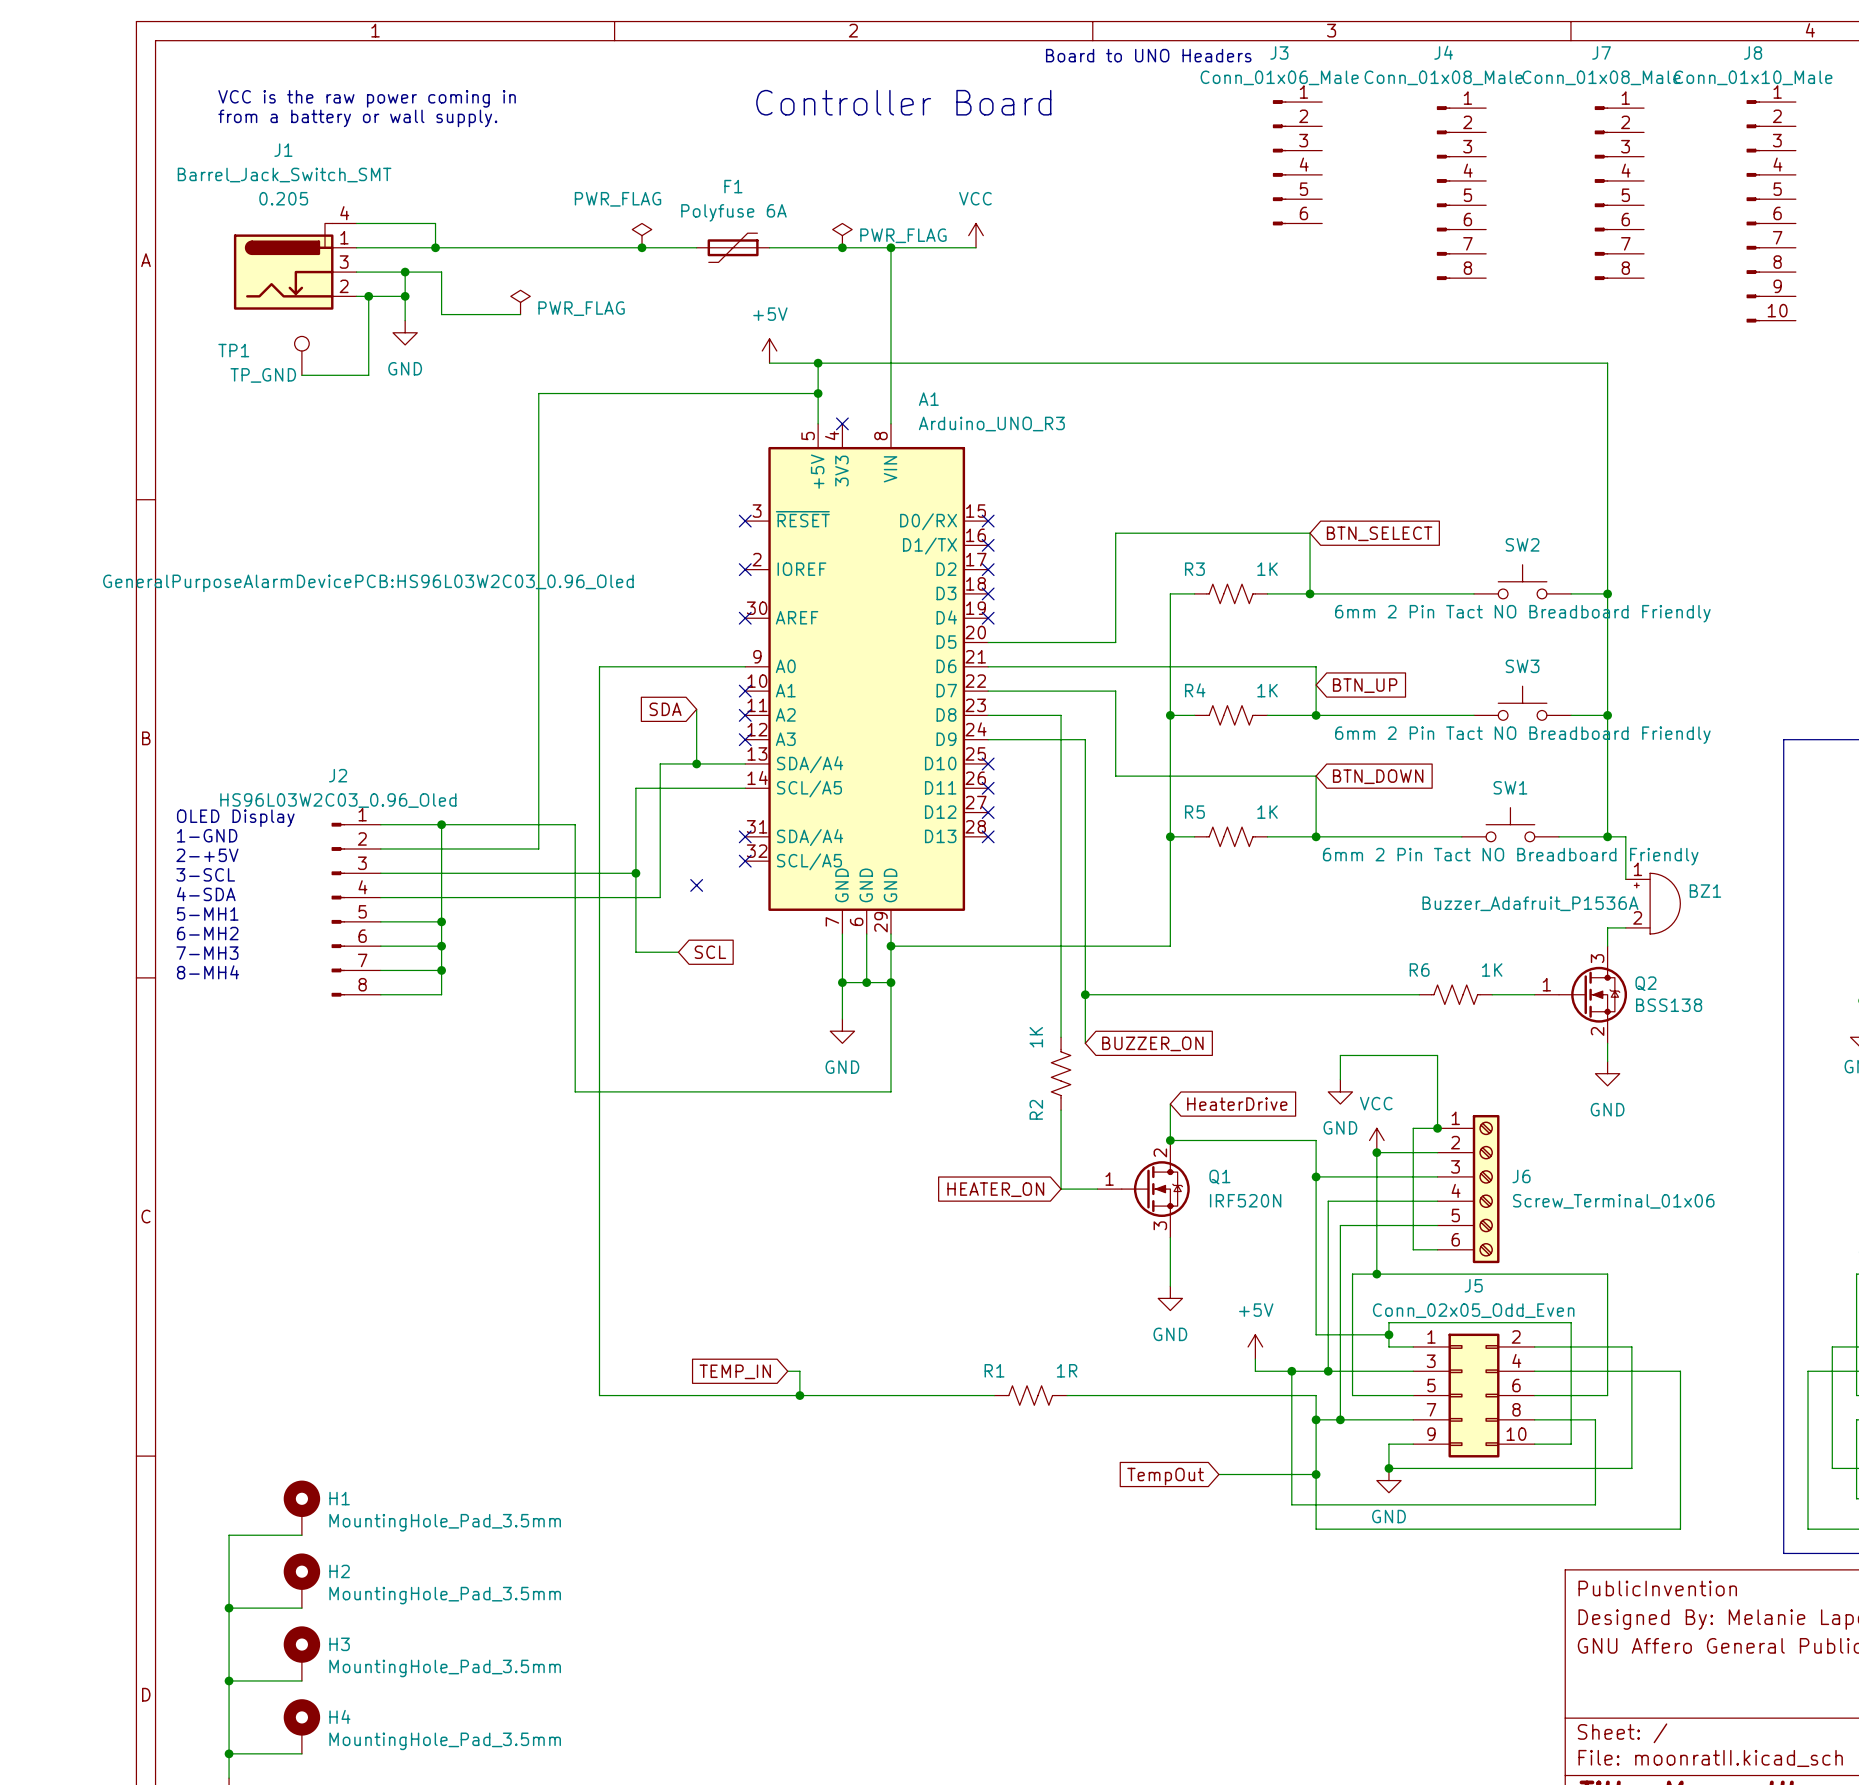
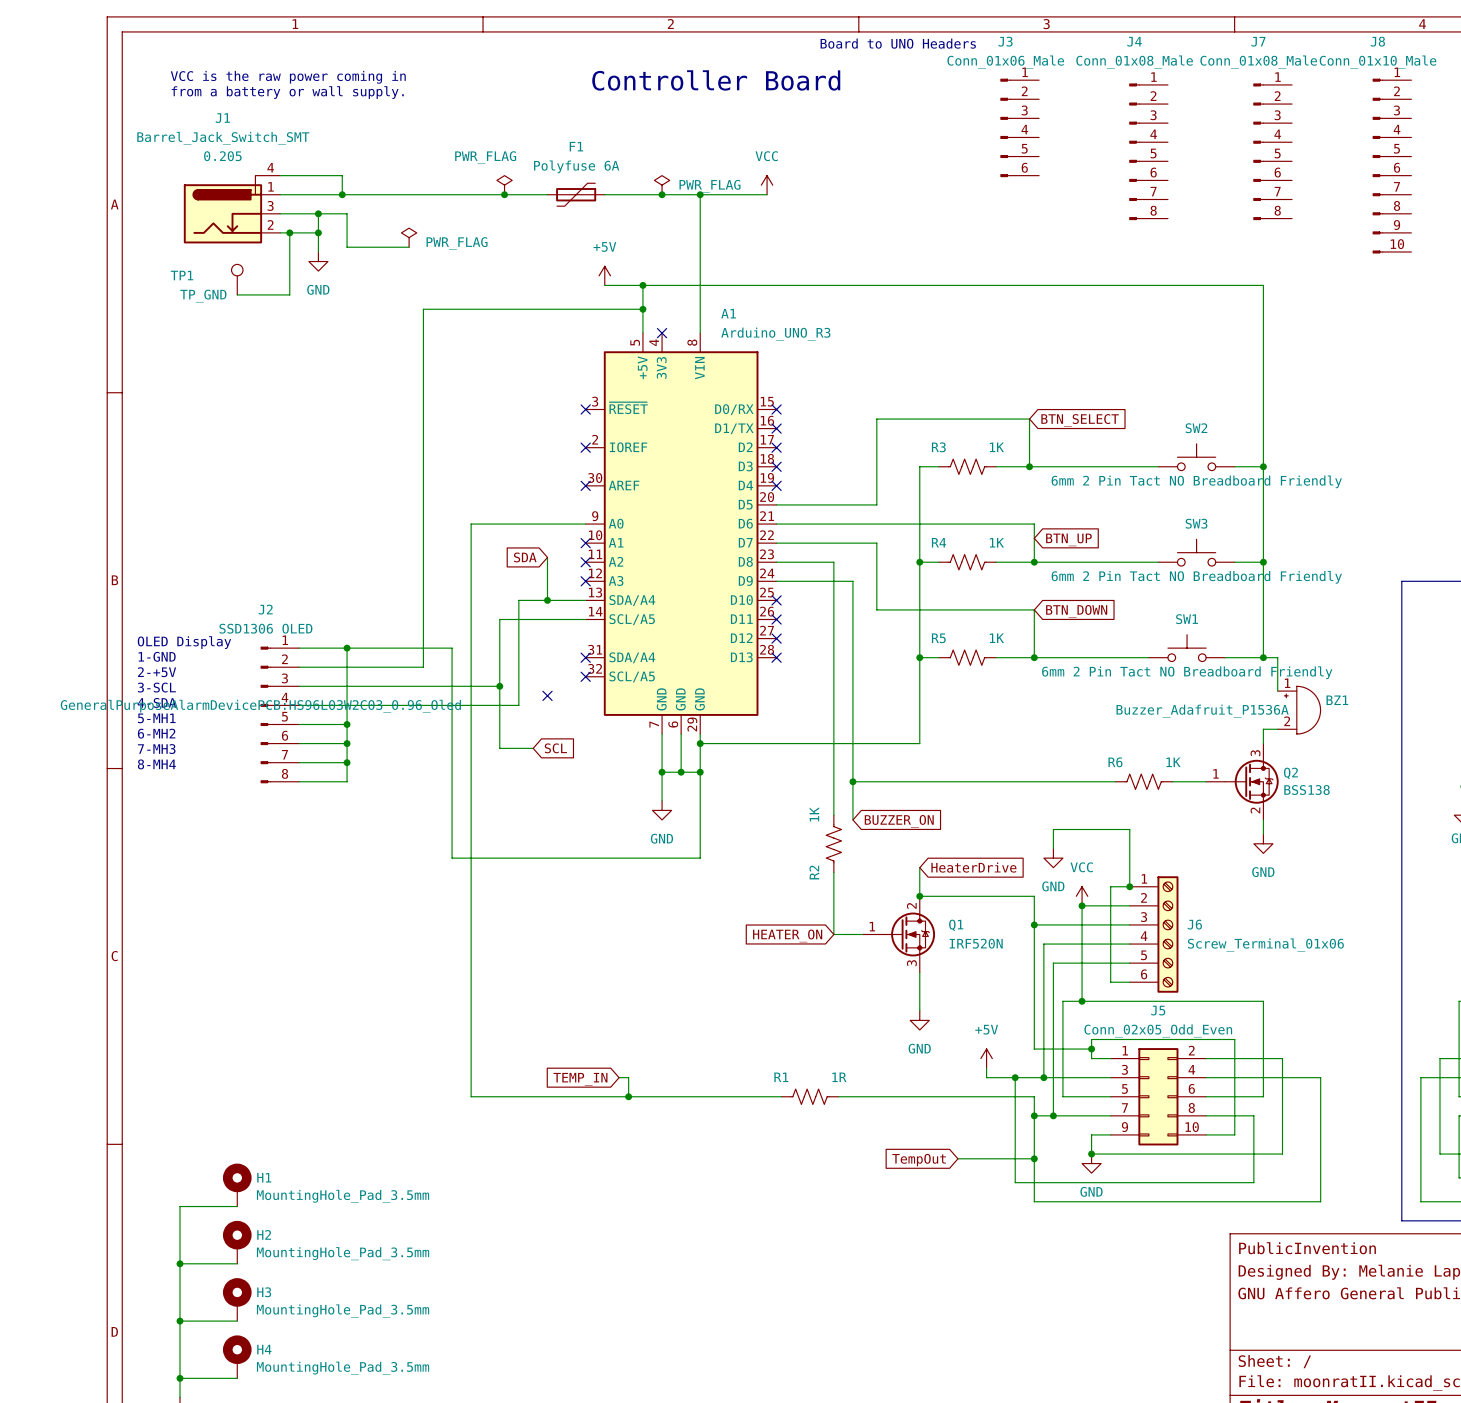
J2 text position: GeneralPurposeAlarmDevicePCB:HS96L03W2C03_0.96_Oled (368, 583) -> GeneralPurposeAlarmDevicePCB:HS96L03W2C03_0.96_Oled (260, 706)
J2 value: HS96L03W2C03_0.96_Oled (338, 800) -> SSD1306 OLED (265, 628)

